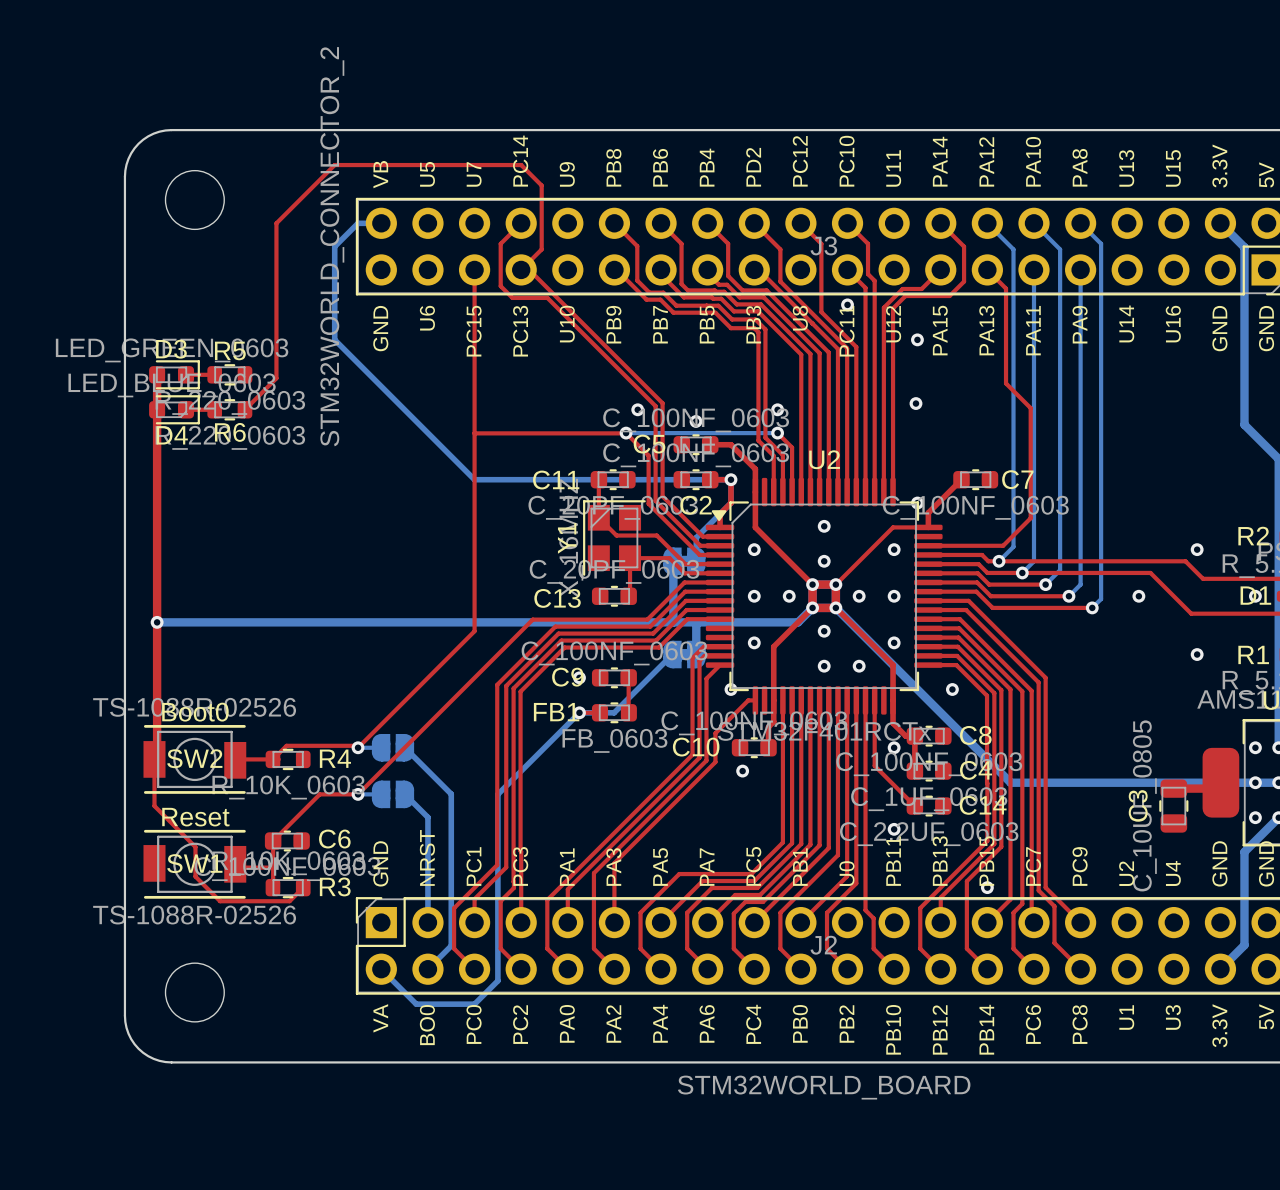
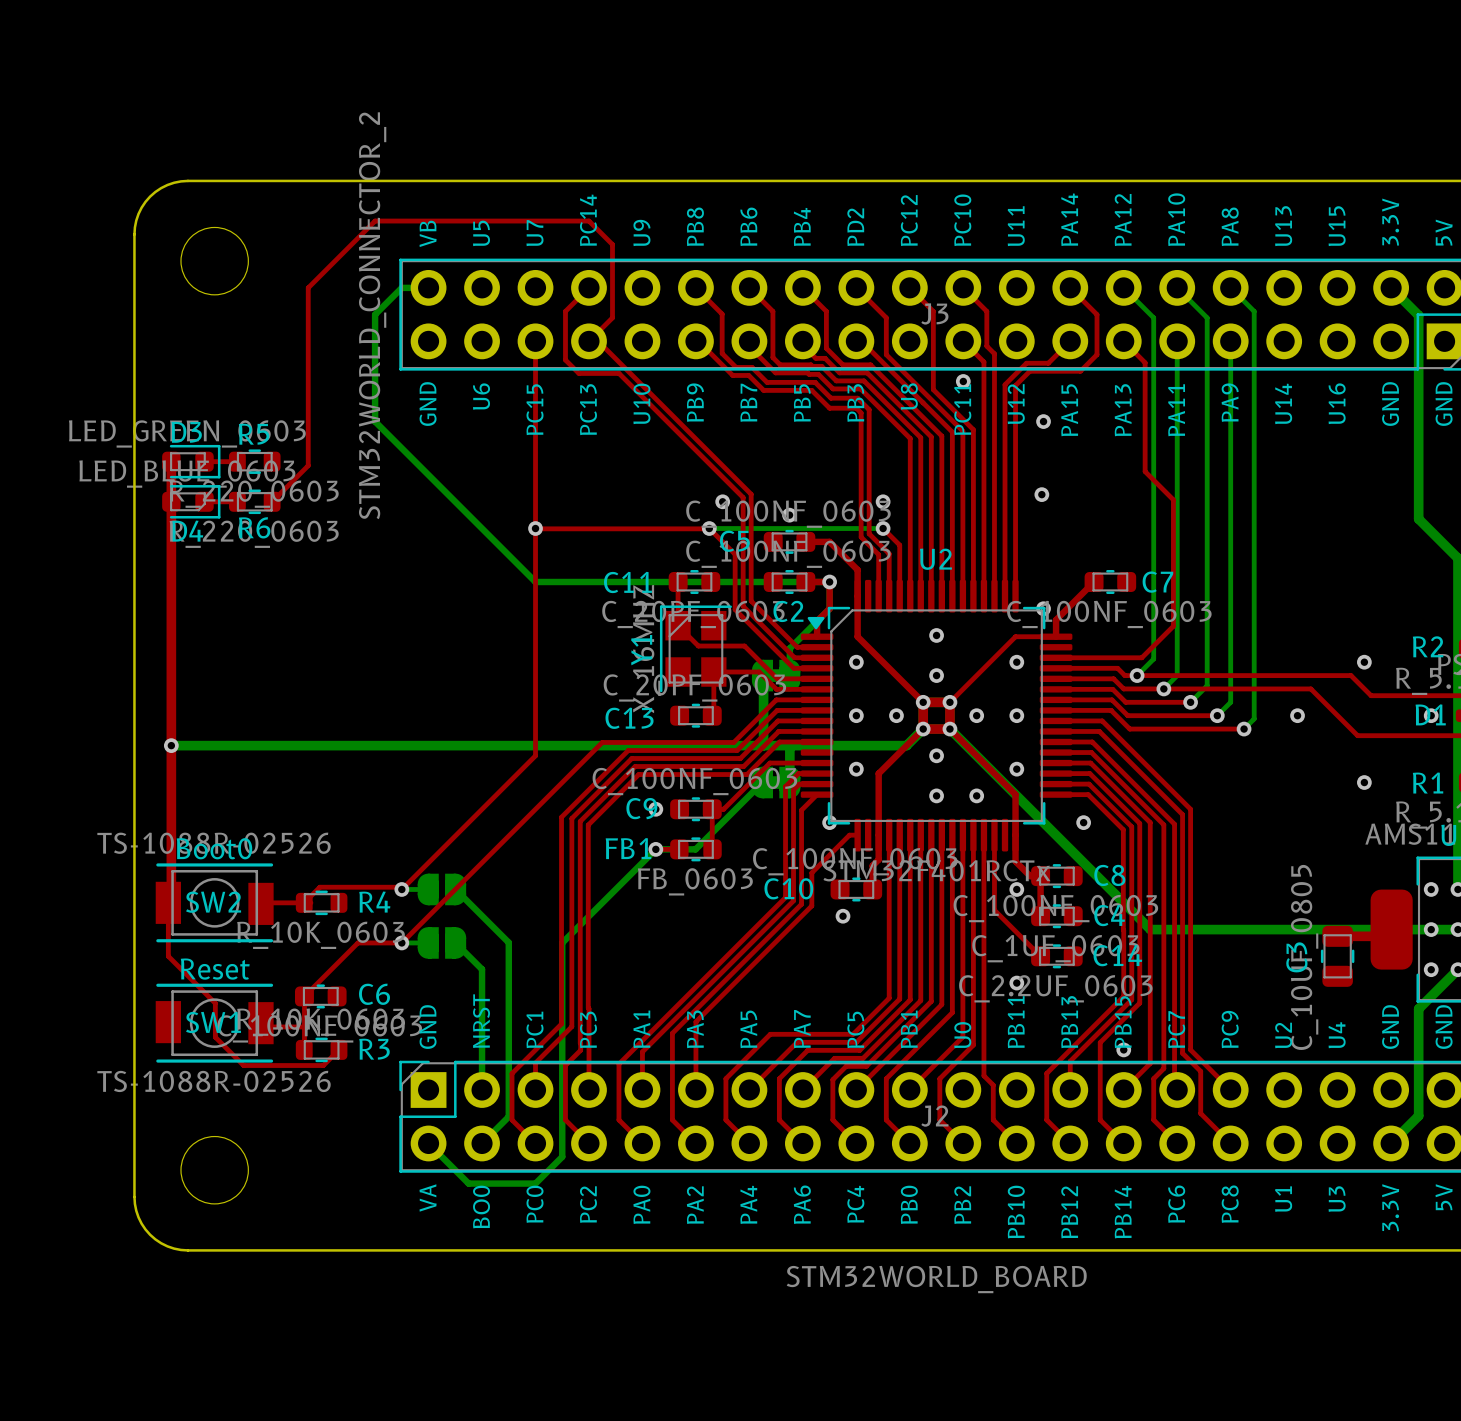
via: none -> (535, 528)
top track: none -> (817, 763) (769, 763) (723, 809) (712, 809)

